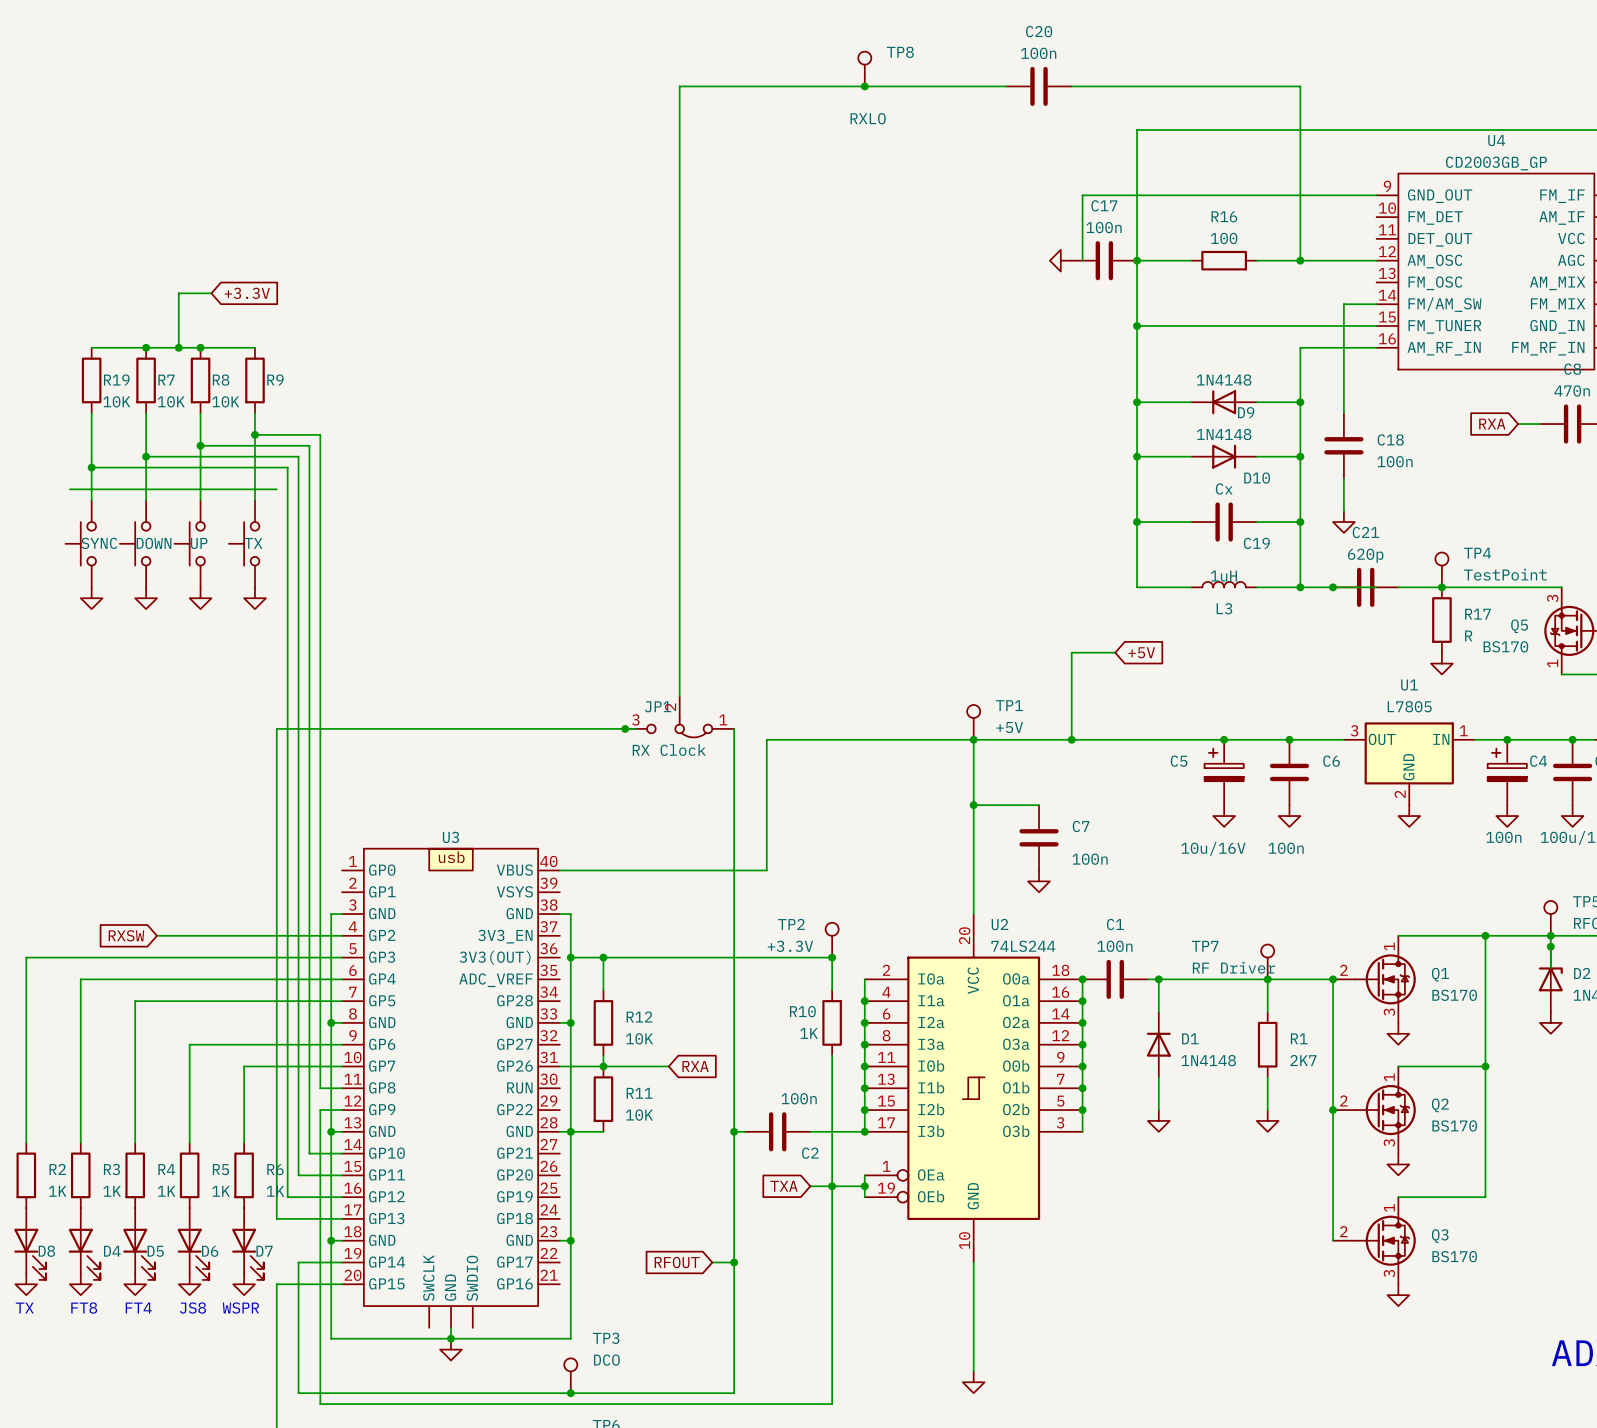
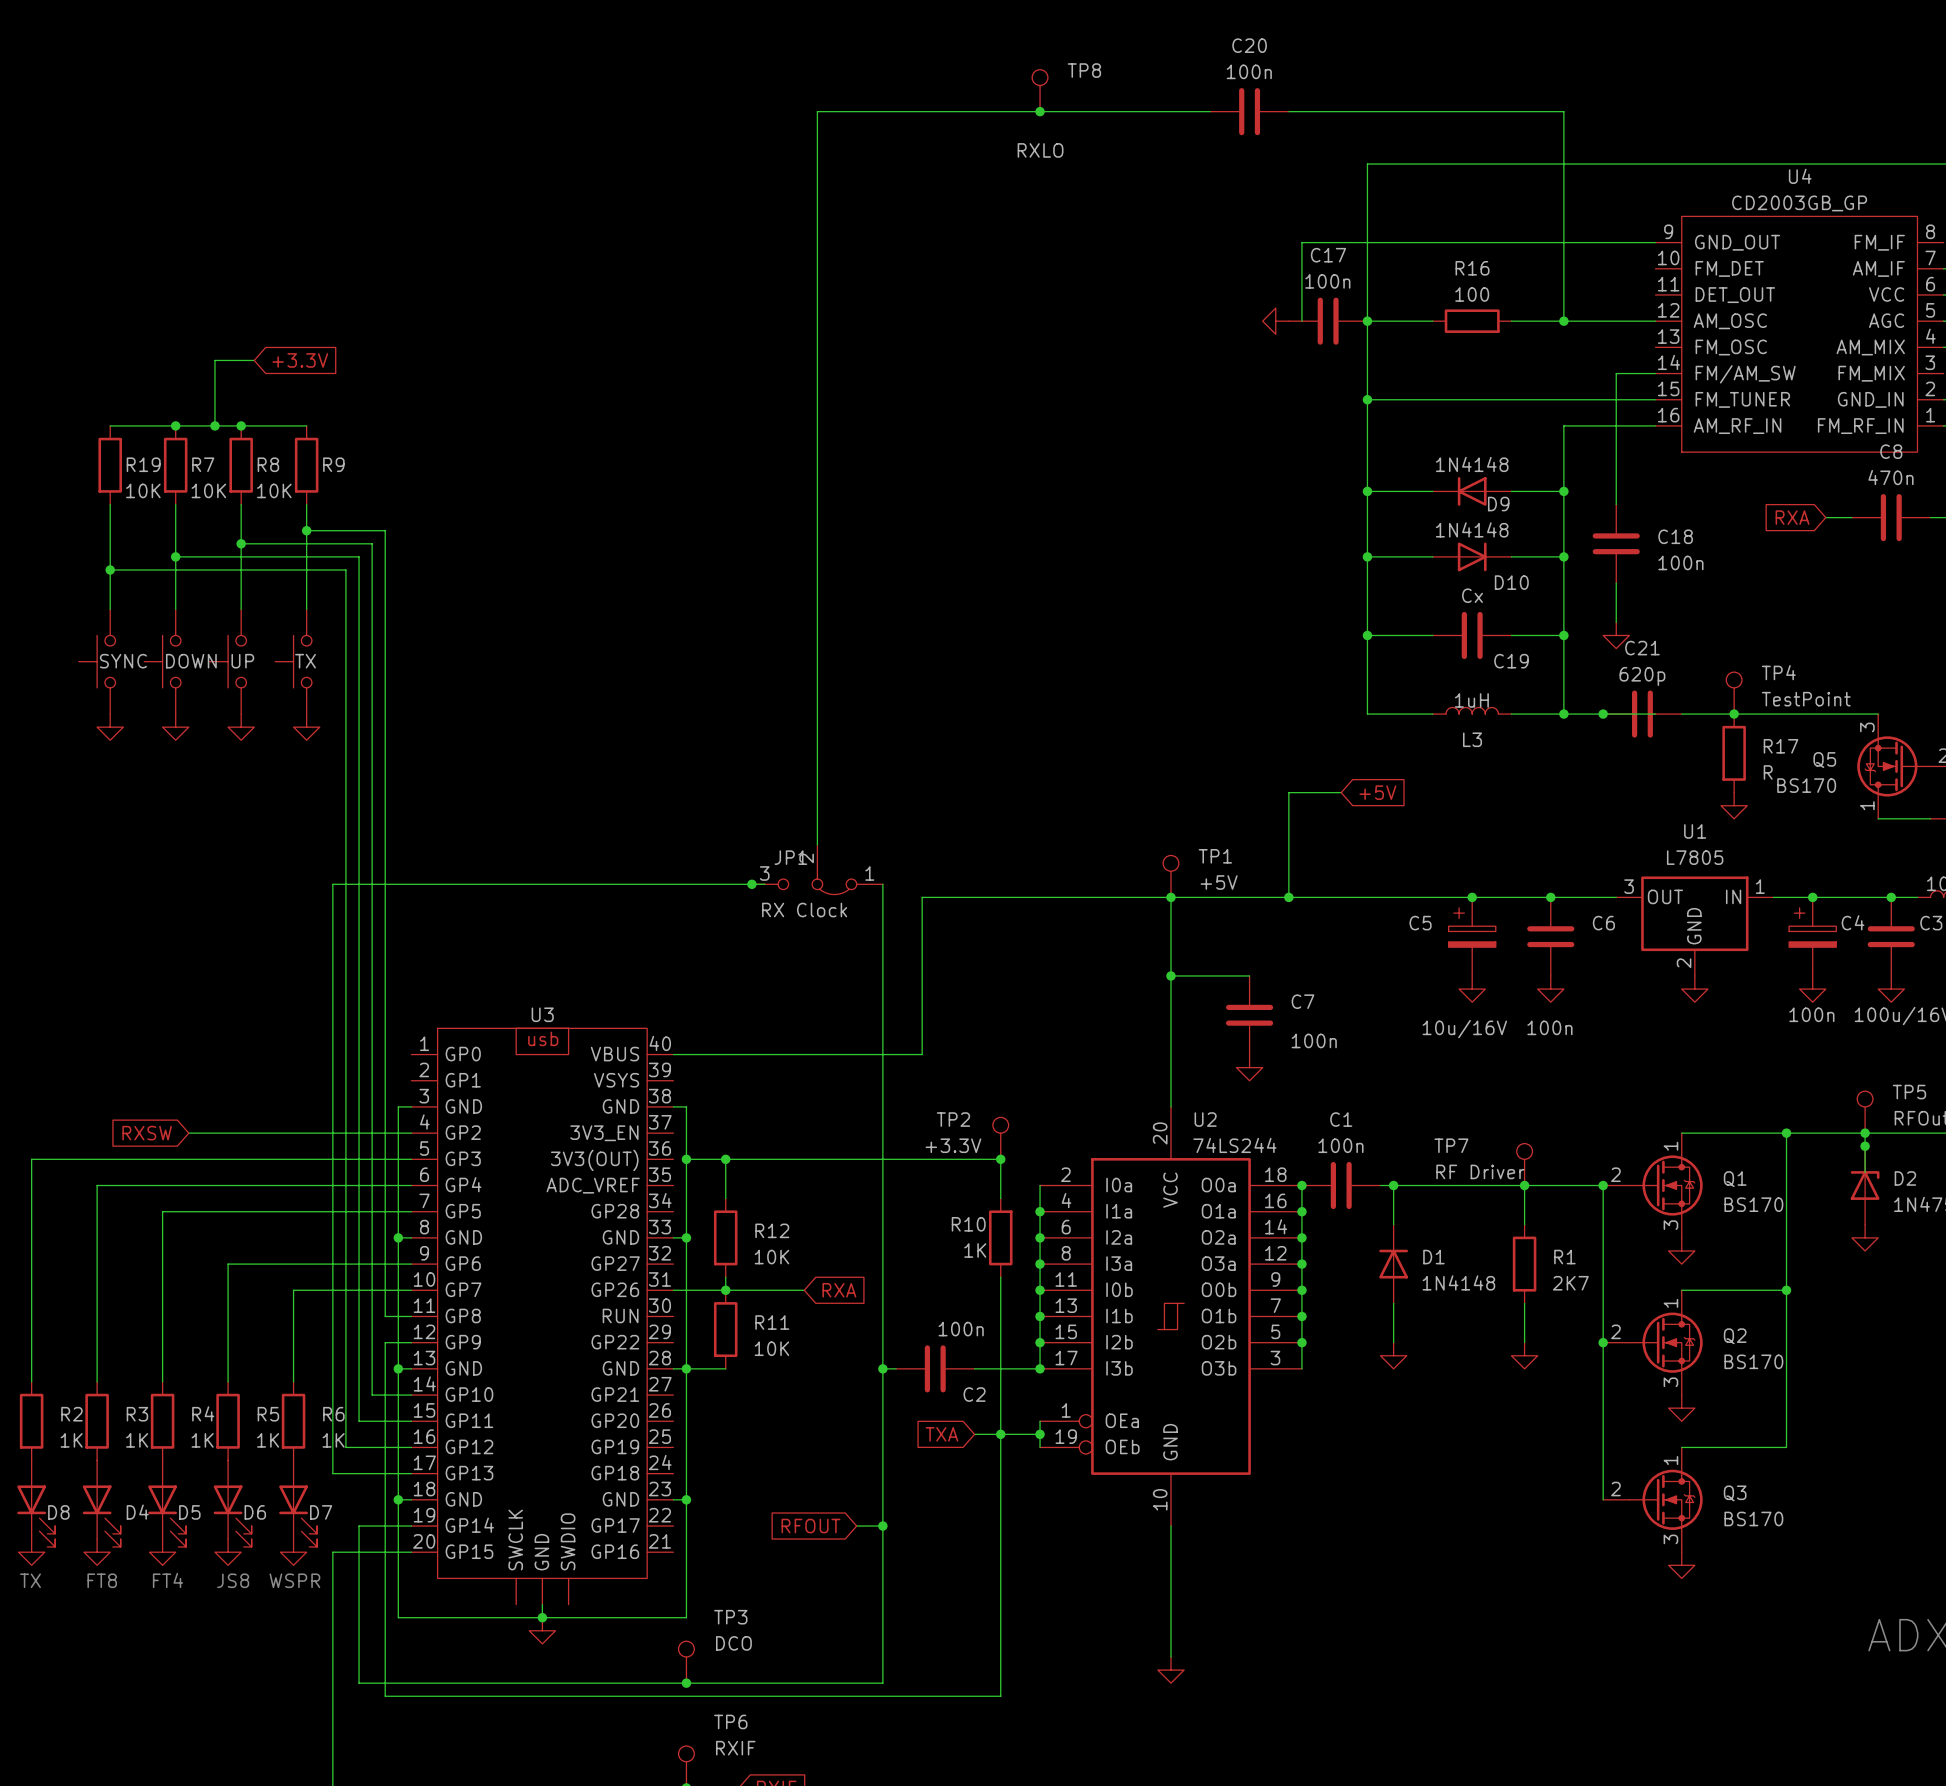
wire: (69, 489) (276, 489) -> none

